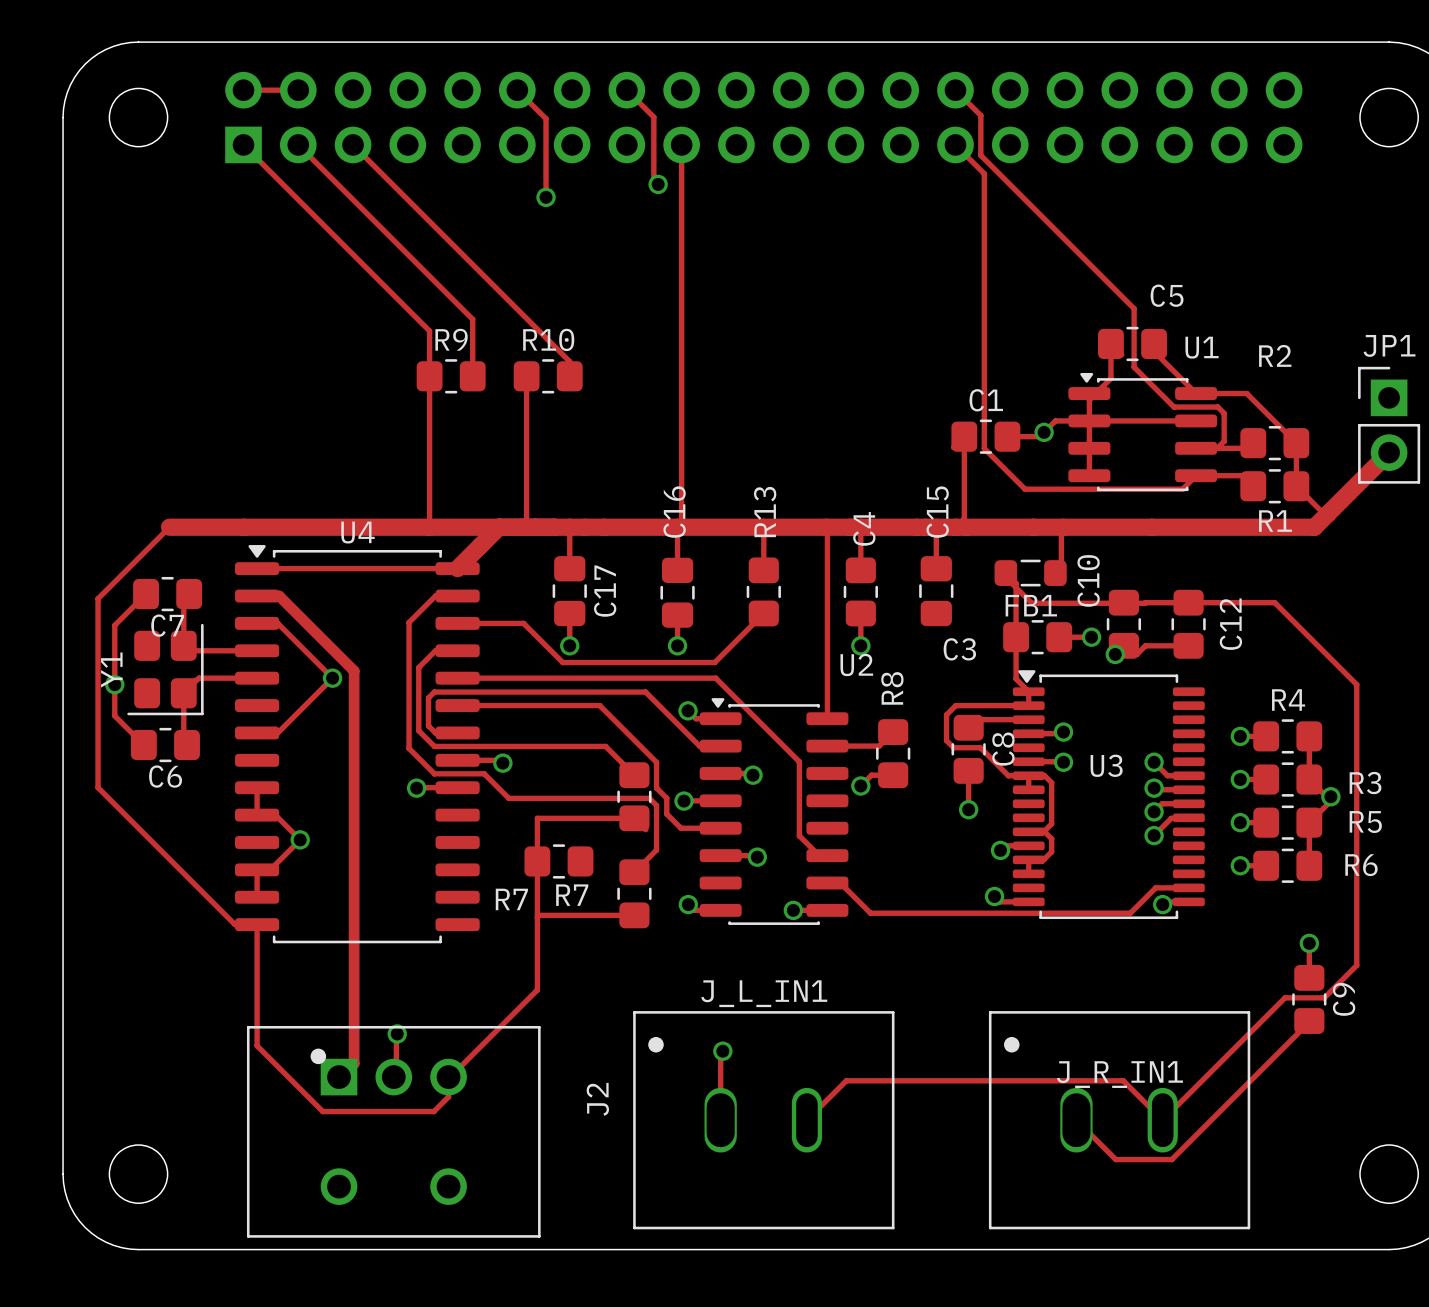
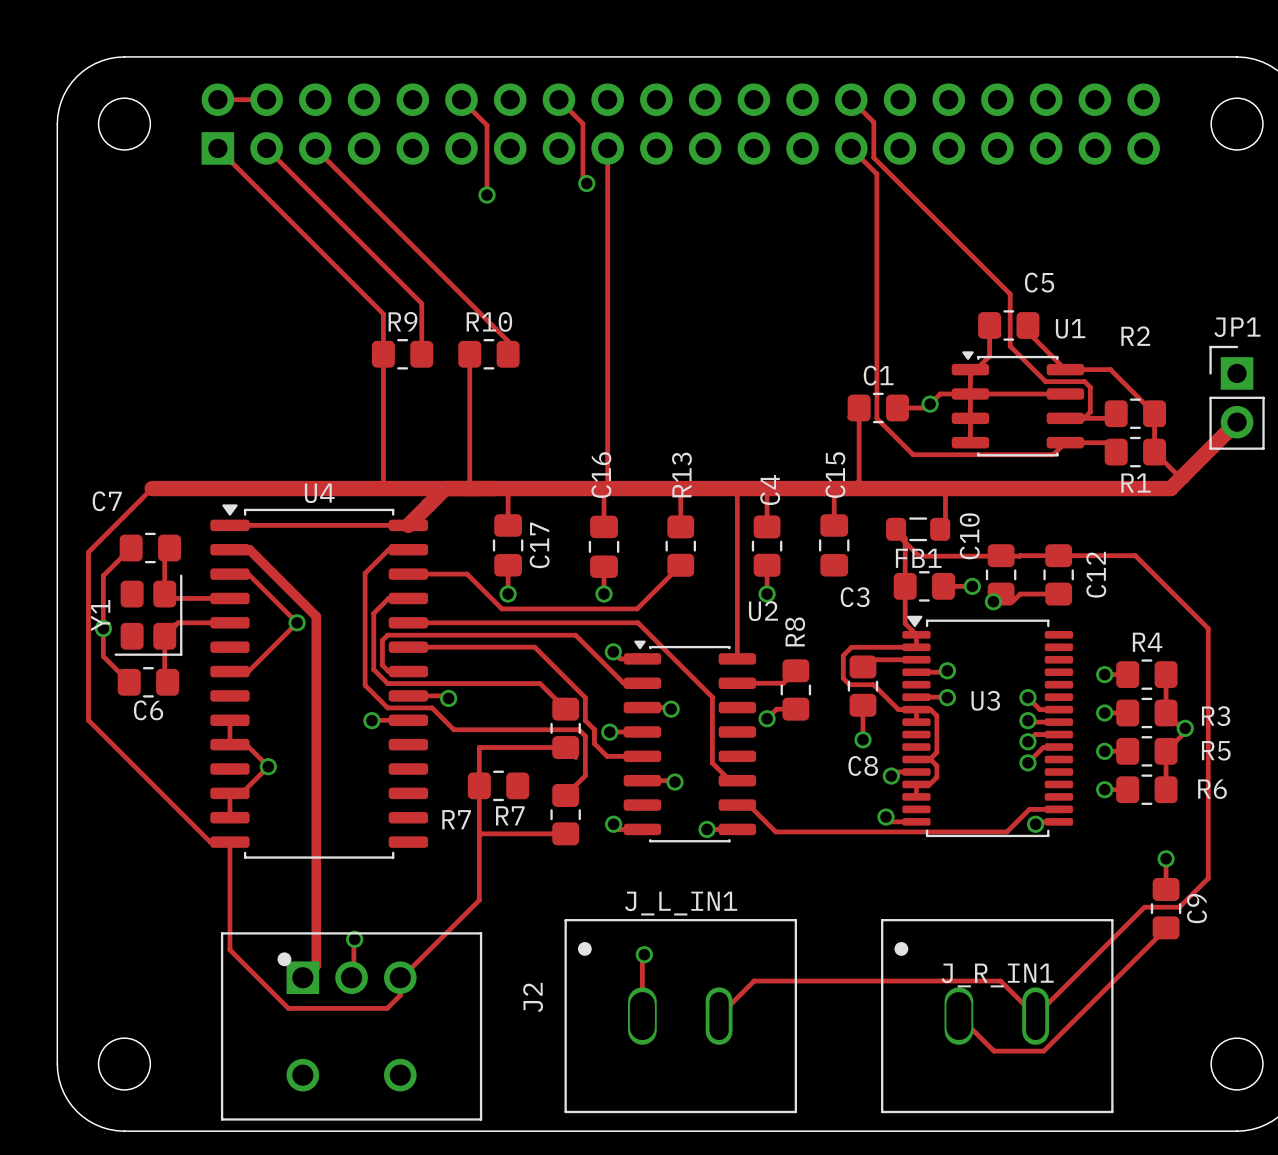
C7 name position: C7 (167, 625) -> C7 (107, 501)
C8 name rotation: 0° (1003, 749) -> 90° clockwise (863, 765)
C8 name position: C8 (1003, 749) -> C8 (863, 765)

